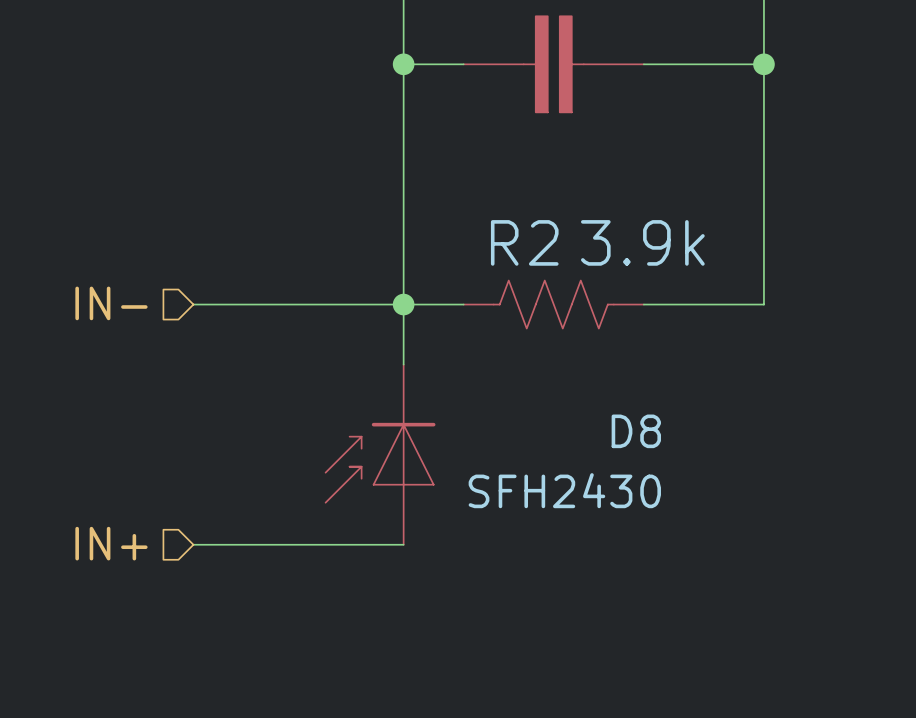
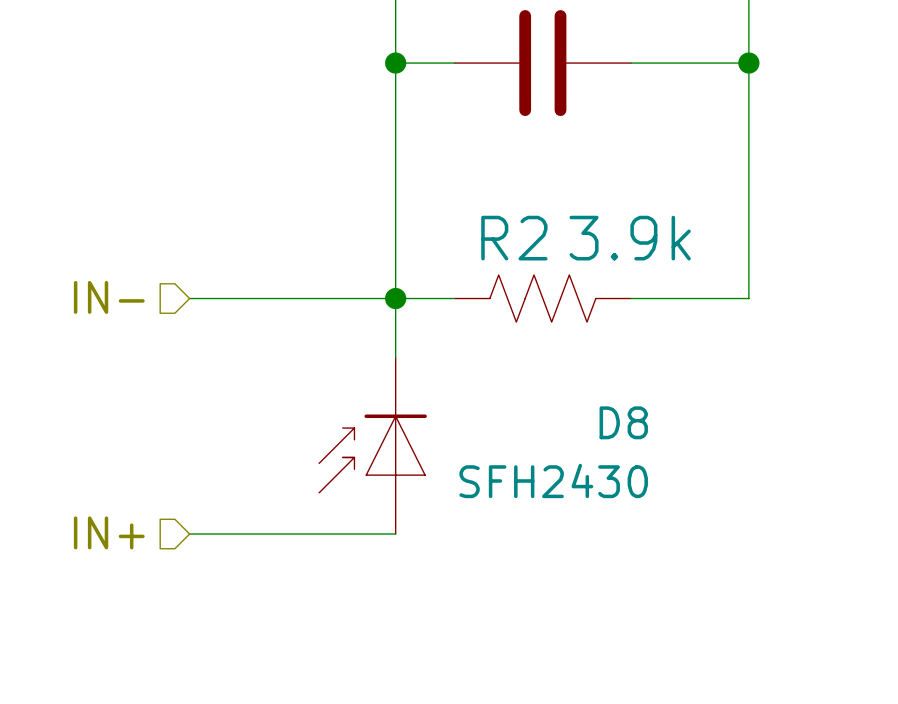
part symbol: [463, 16, 644, 113] -> [454, 10, 632, 117]

